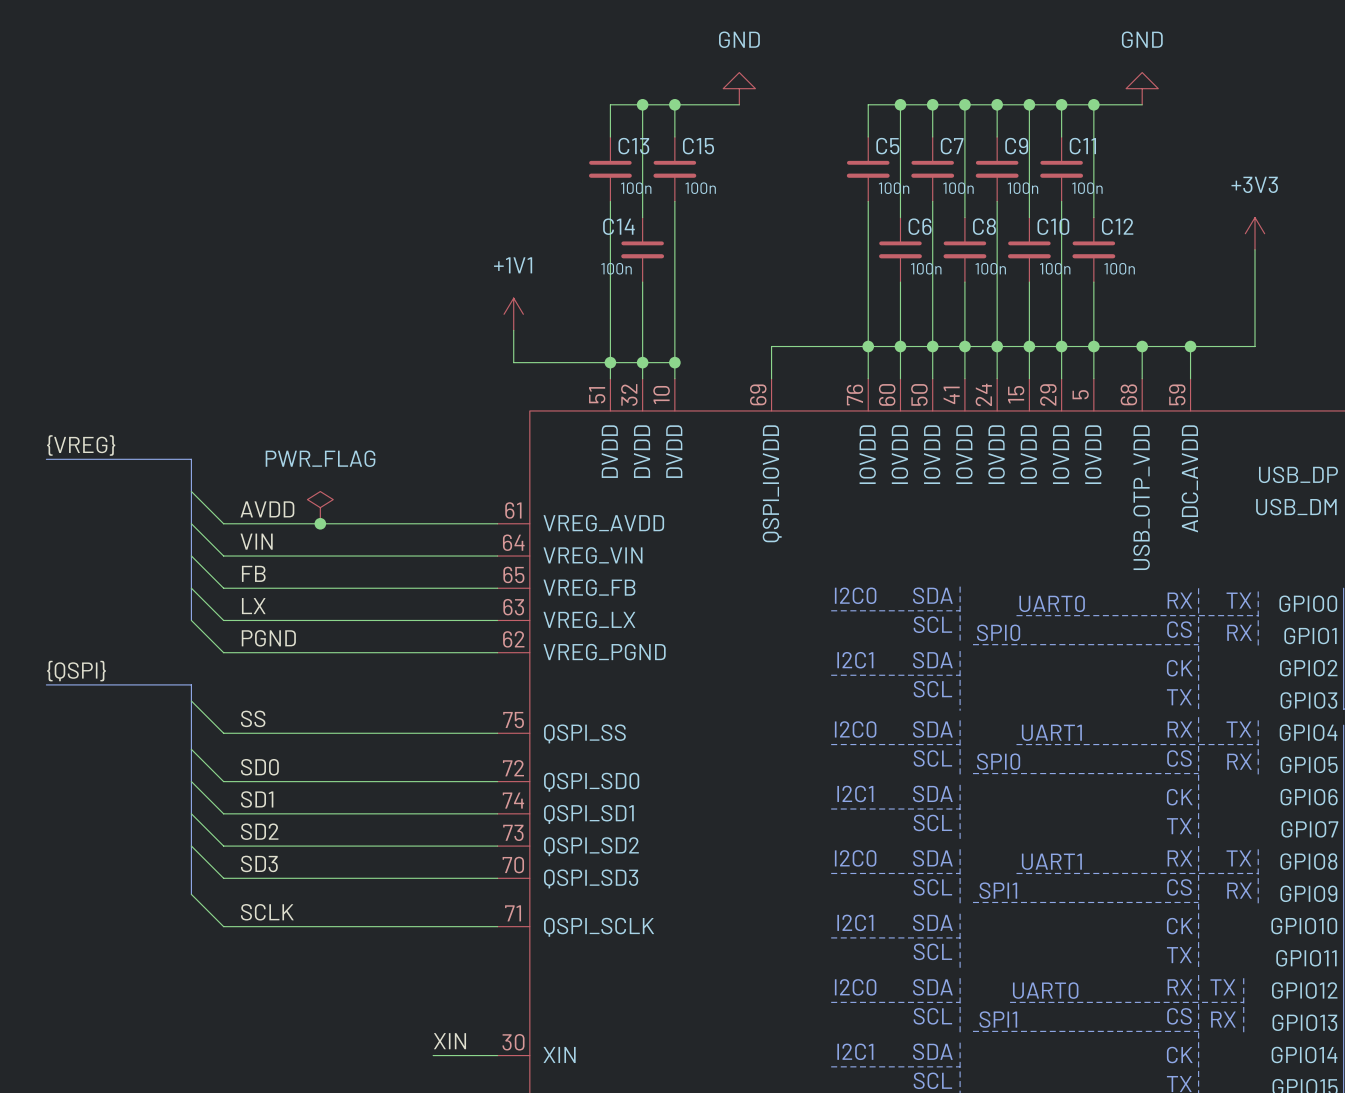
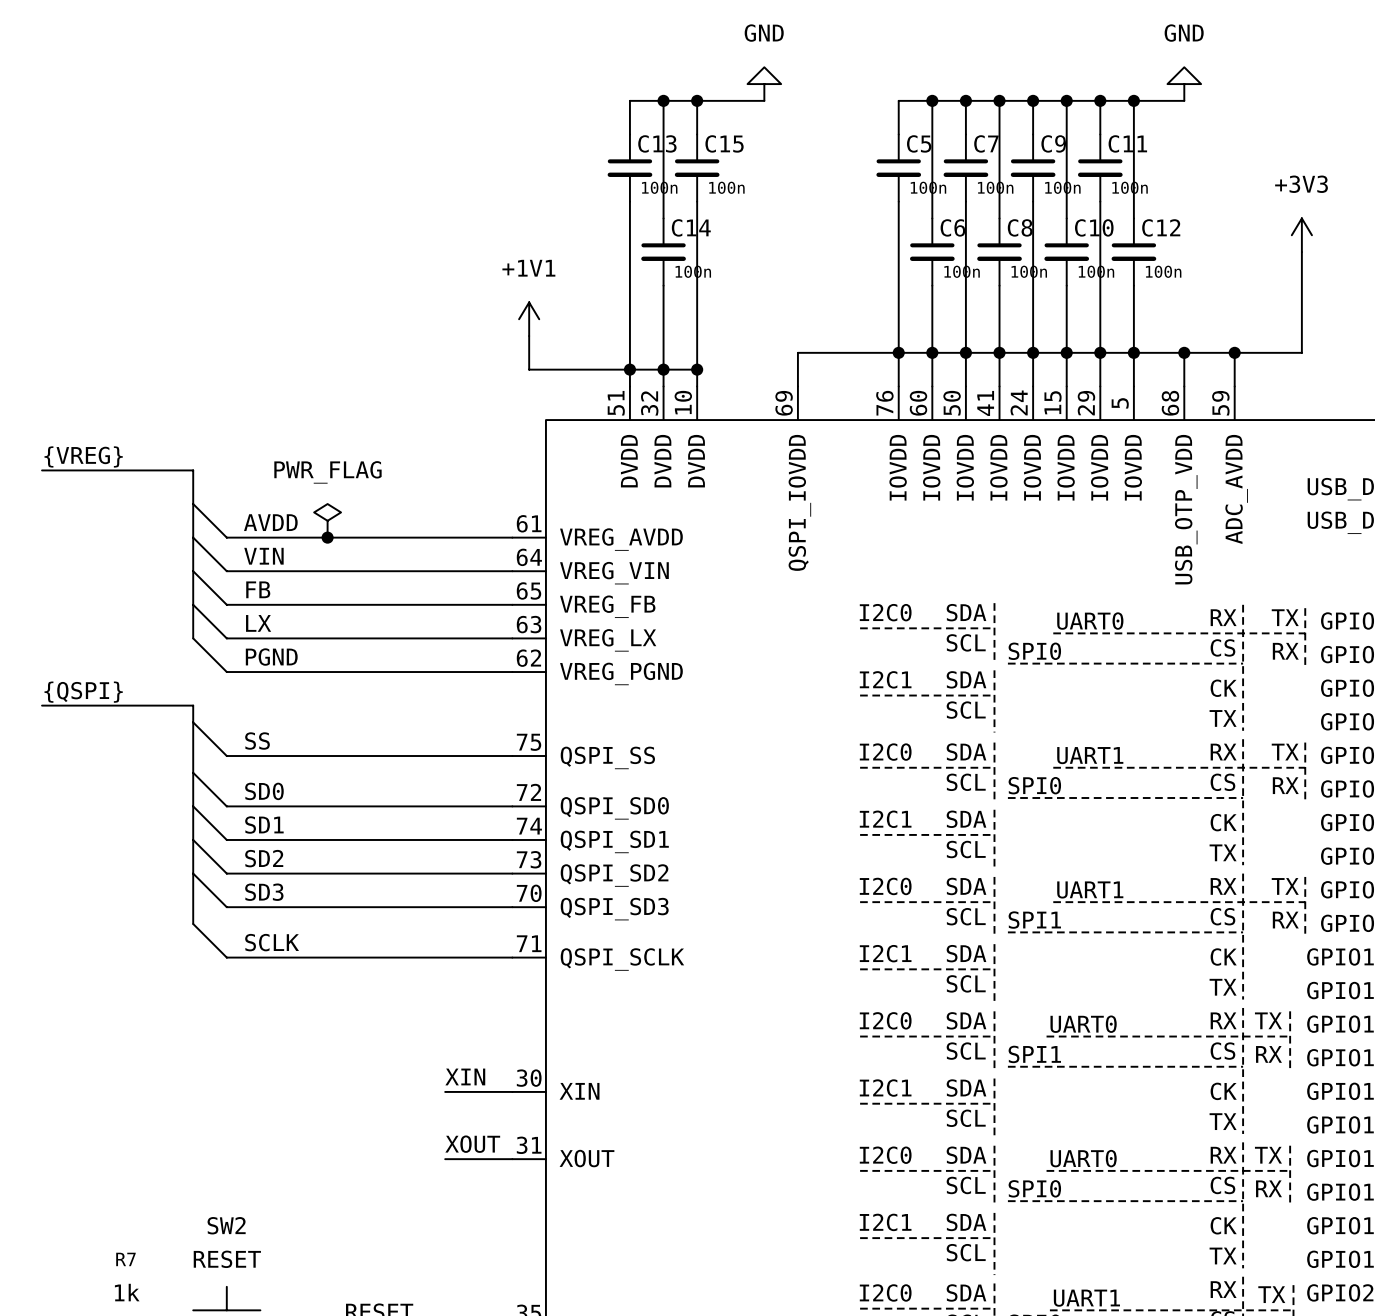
C14 name position: C14 (618, 226) -> C14 (691, 227)
C14 value position: 100n (616, 268) -> 100n (693, 271)

